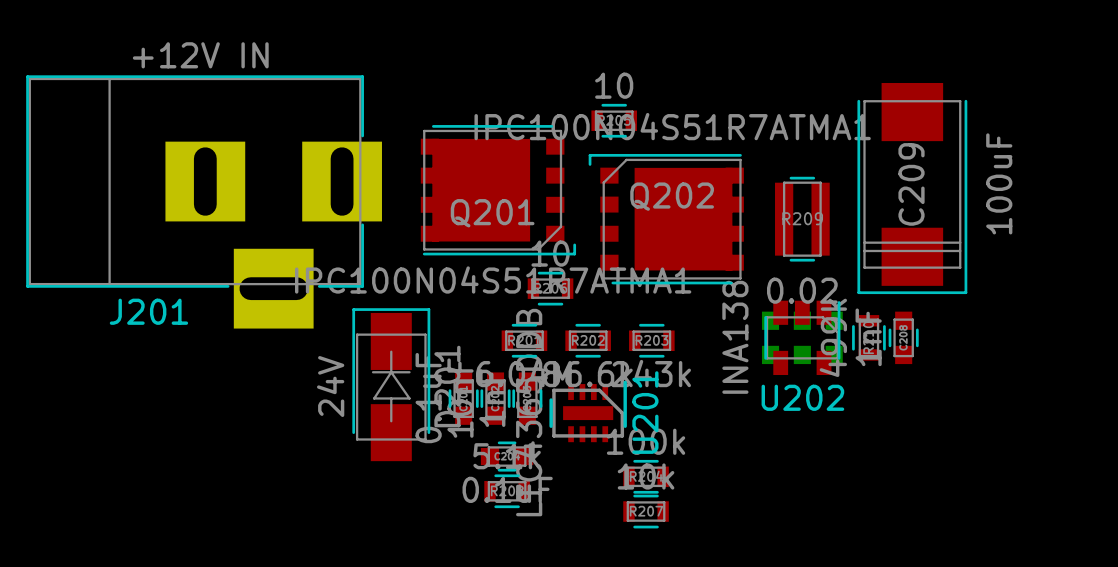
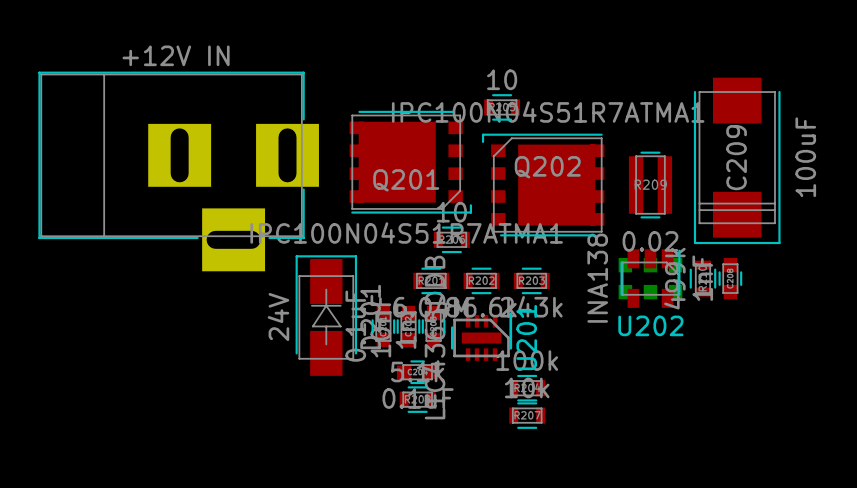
J201 name: J201 (148, 311) -> none

